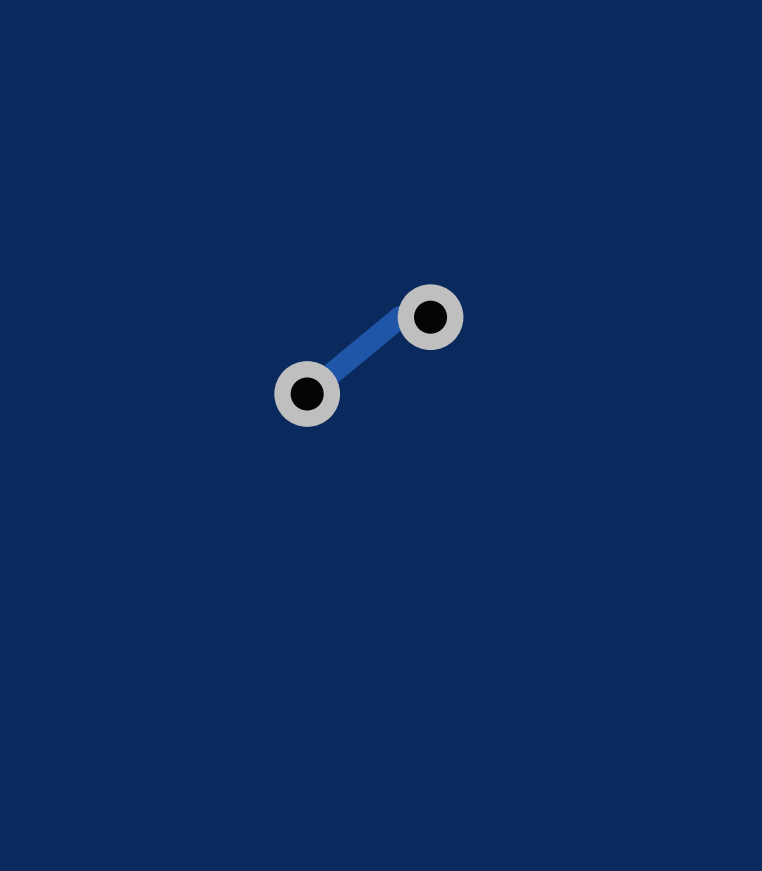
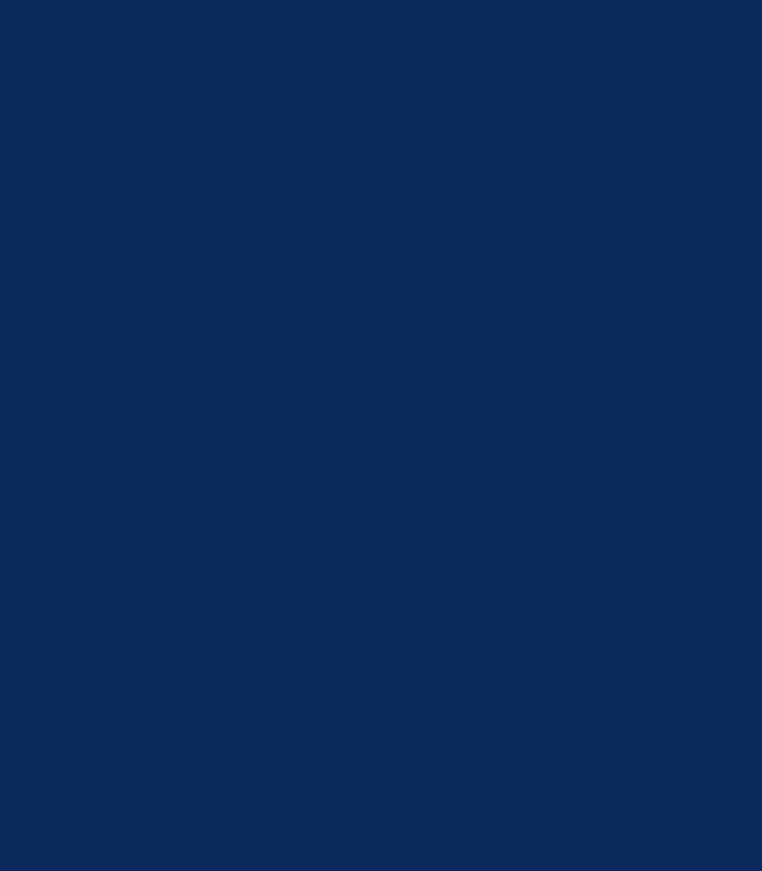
track: (430, 317) (400, 317) (307, 393) -> none
via: (430, 317) -> none
via: (307, 393) -> none

